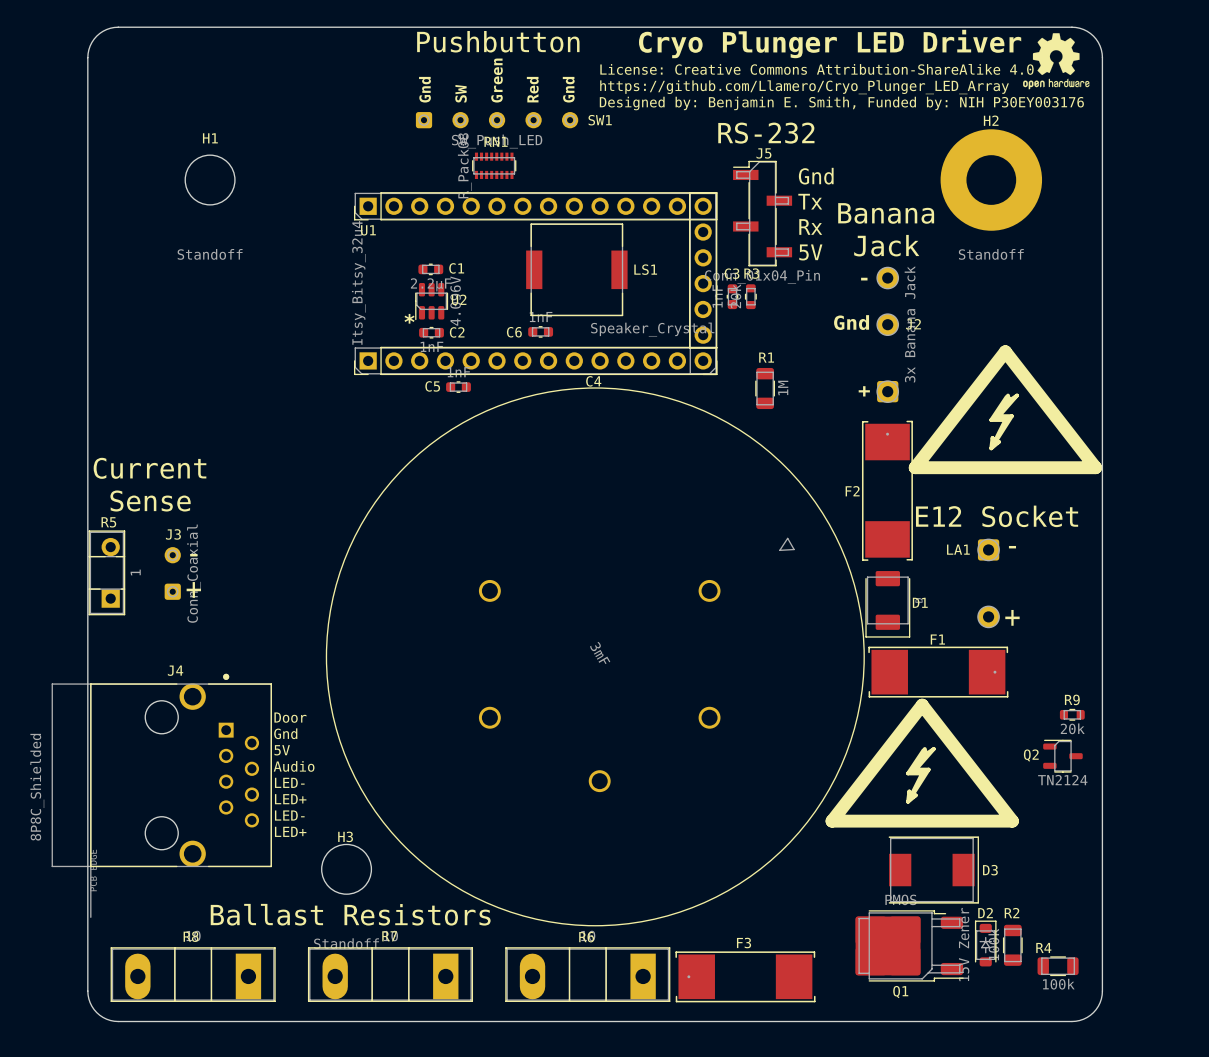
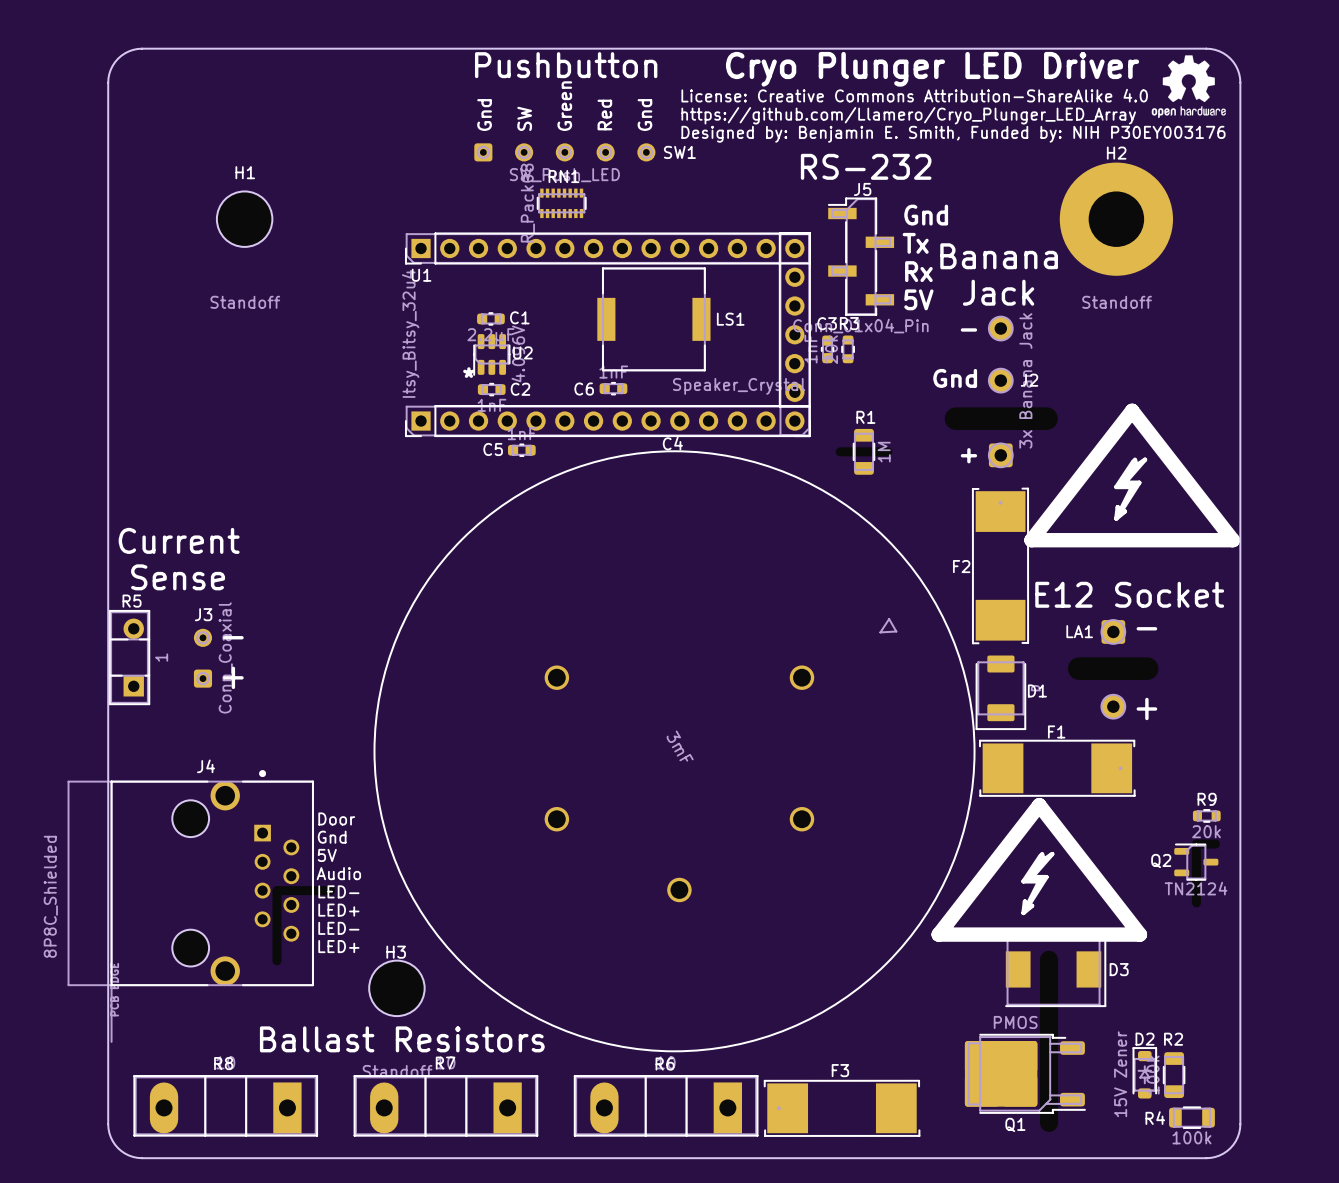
D3 position: (933, 870) -> (1055, 969)
R4 footprint: [1037, 940, 1079, 992] -> [1169, 1106, 1215, 1129]
D2 position: (985, 943) -> (1144, 1072)
R2 position: (1012, 945) -> (1174, 1075)
R4 name position: R4 (1043, 947) -> R4 (1155, 1118)

